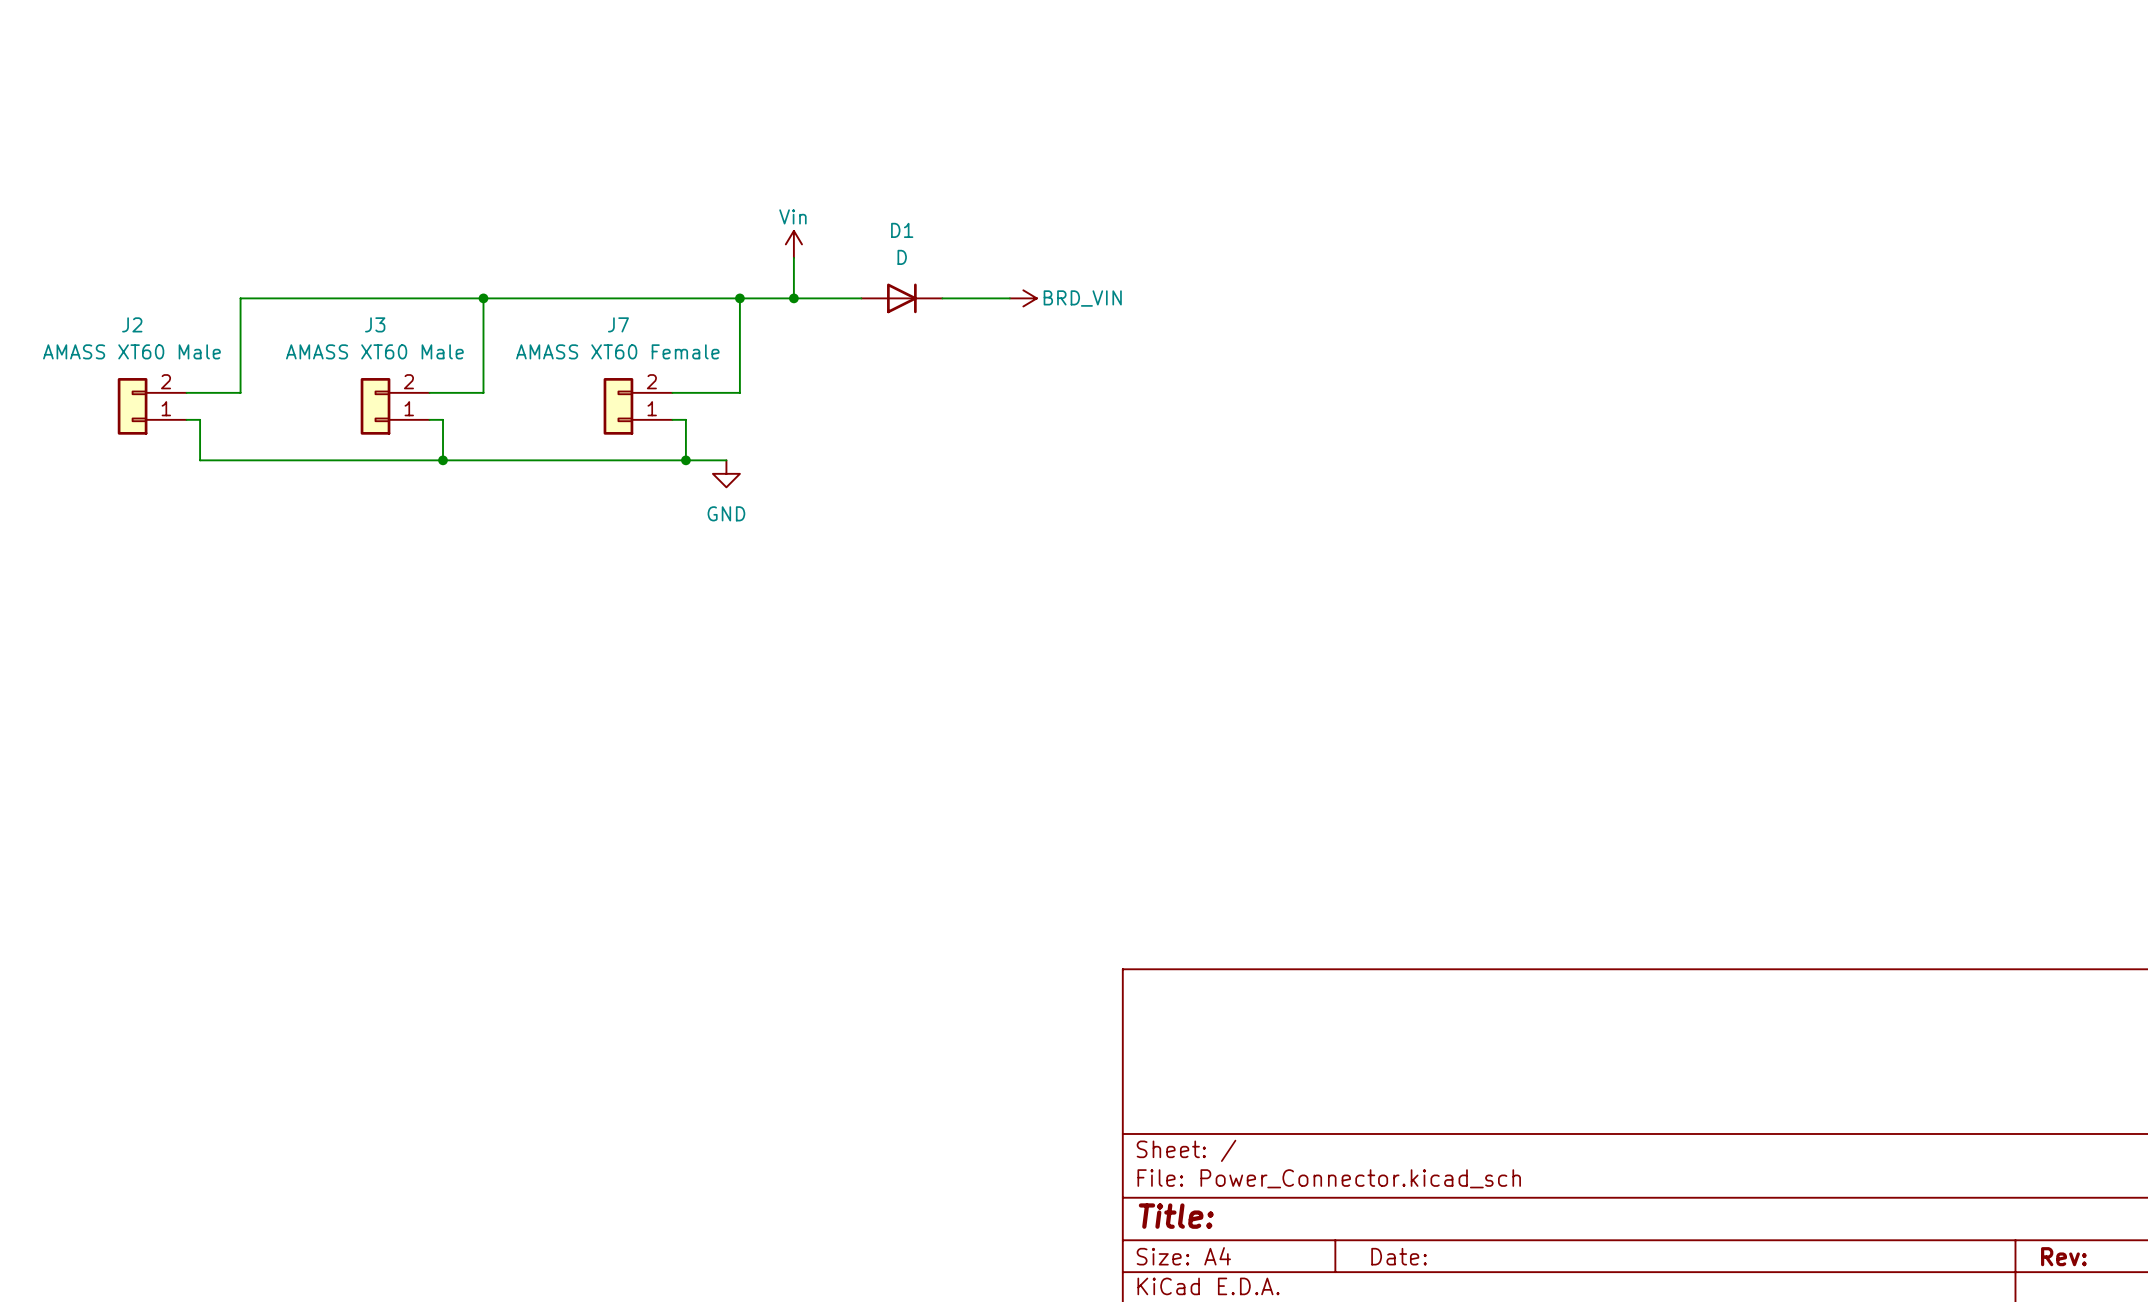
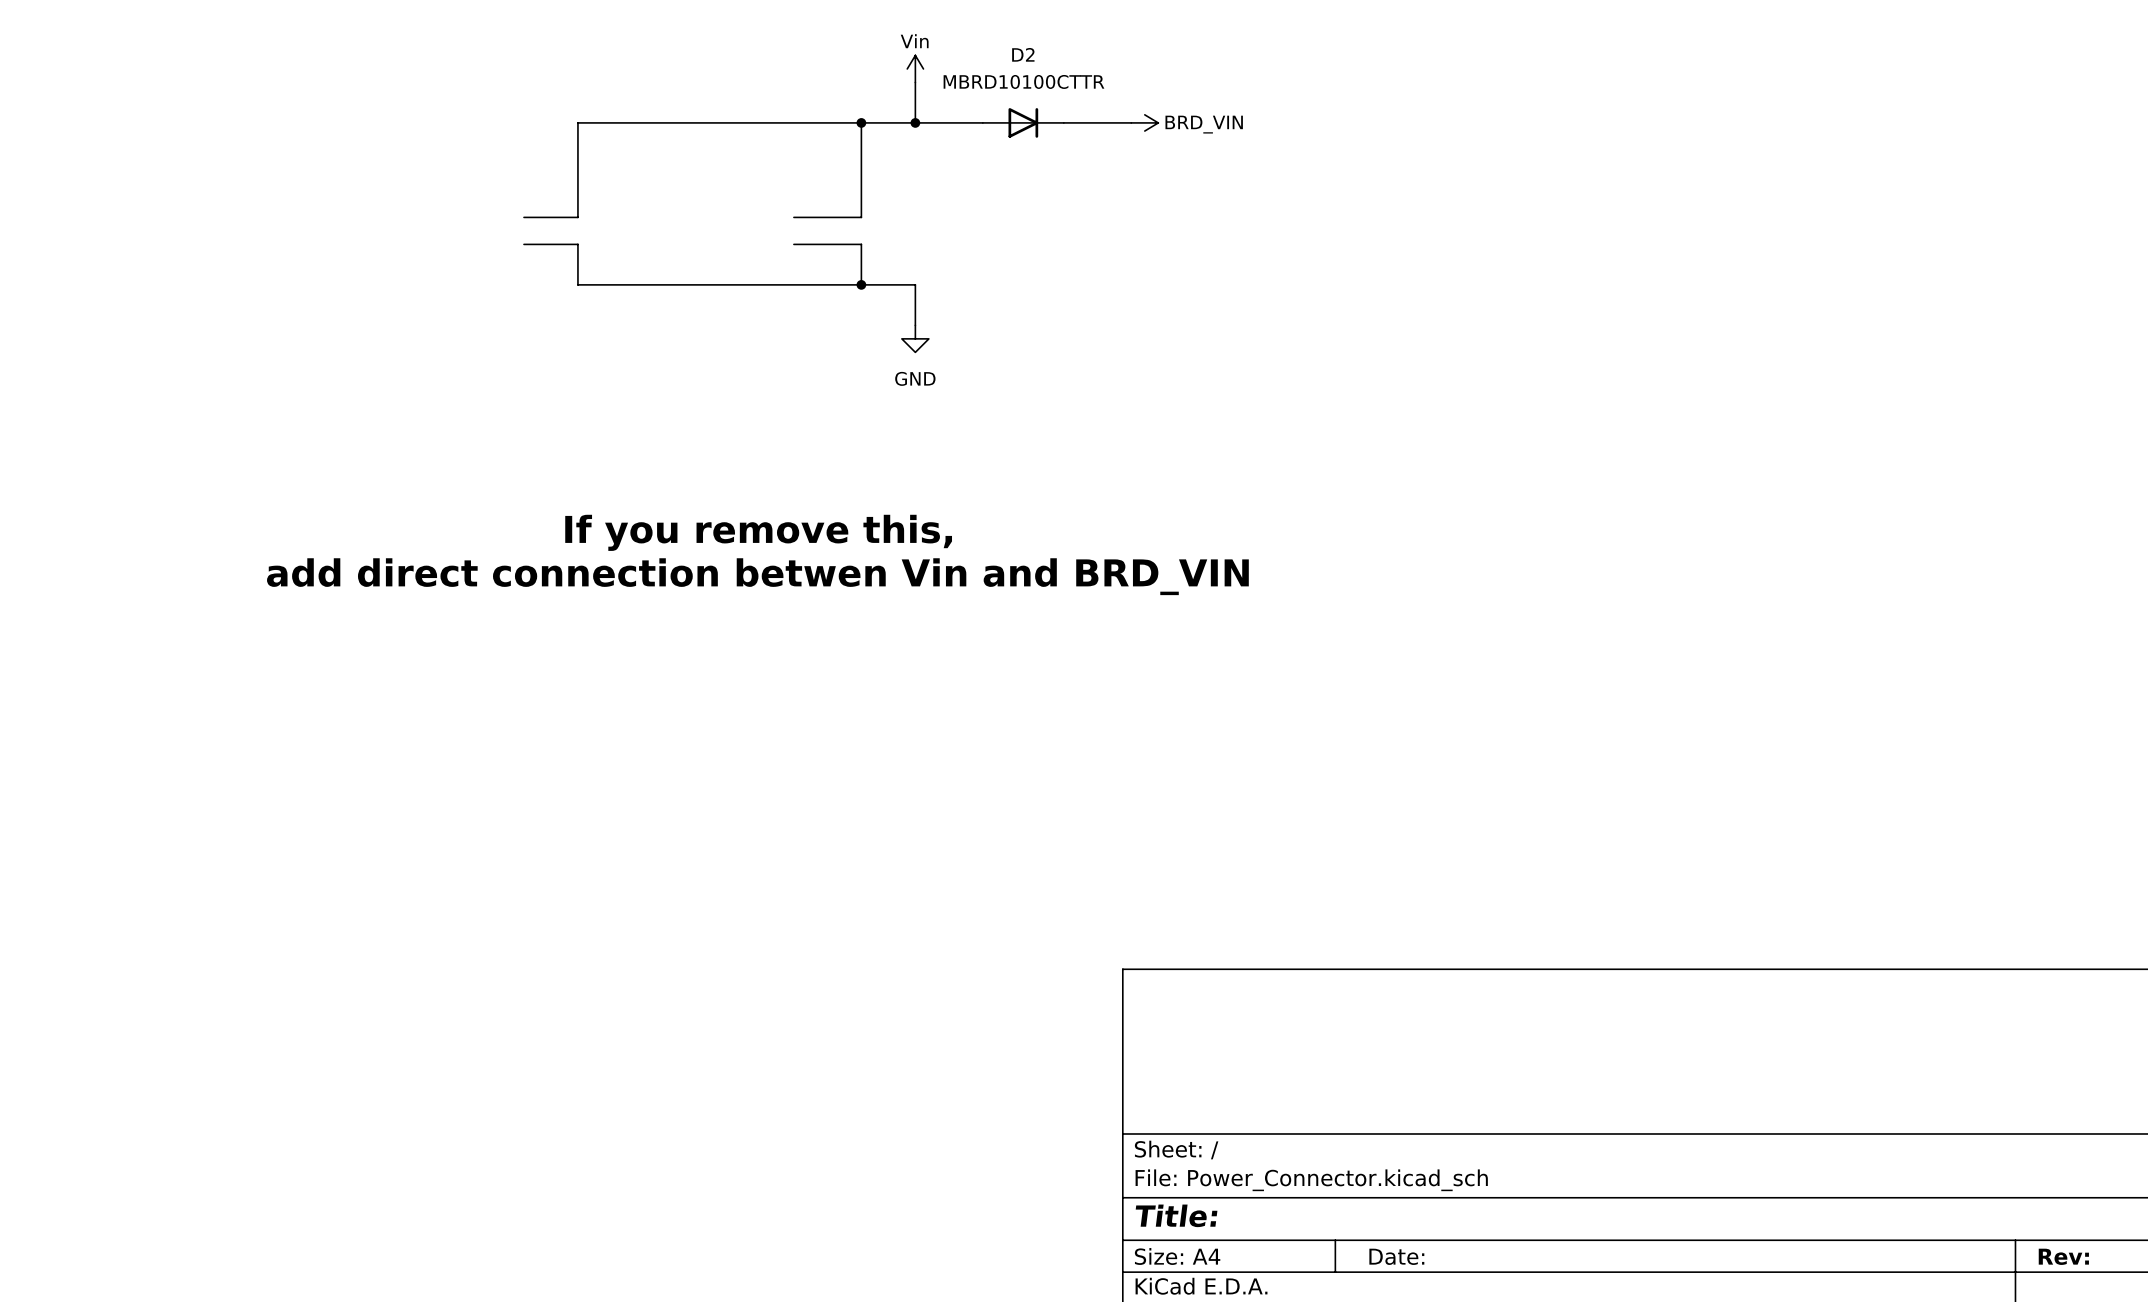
junction: none -> (861, 122)
junction: none -> (915, 122)
wire: none -> (982, 122) (577, 122) (577, 217) (523, 217)
D2: none -> MBRD10100CTTR (1023, 122)
wire: none -> (523, 244) (577, 244) (577, 284) (915, 284) (915, 325)
wire: none -> (793, 244) (861, 244) (861, 284)
power symbol position: Vin (793, 244) -> Vin (915, 68)
wire: (793, 257) (793, 298) -> (915, 82) (915, 122)
junction: none -> (861, 284)
wire: (483, 298) (483, 392) (429, 392) -> none
junction: (483, 298) -> none
wire: (739, 298) (739, 392) (672, 392) -> (861, 122) (861, 217) (793, 217)
junction: (739, 298) -> none
junction: (793, 298) -> none
wire: (861, 298) (240, 298) (240, 392) (186, 392) -> none
D1: D (901, 298) -> none
wire: (942, 298) (1009, 298) -> (1063, 122) (1131, 122)
power symbol position: BRD_VIN (1023, 298) -> BRD_VIN (1144, 122)
J2: AMASS XT60 Male (152, 406) -> none
J3: AMASS XT60 Male (395, 406) -> none
J7: AMASS XT60 Female (638, 406) -> none
wire: (186, 419) (200, 419) (200, 460) (726, 460) -> none
wire: (429, 419) (443, 419) (443, 460) -> none
wire: (672, 419) (685, 419) (685, 460) -> none
junction: (443, 460) -> none
junction: (685, 460) -> none
power symbol position: GND (726, 473) -> GND (915, 338)
text: none -> If you remove this, (758, 532)
text: none -> add direct connection betwen Vin and BRD_VIN (757, 576)

